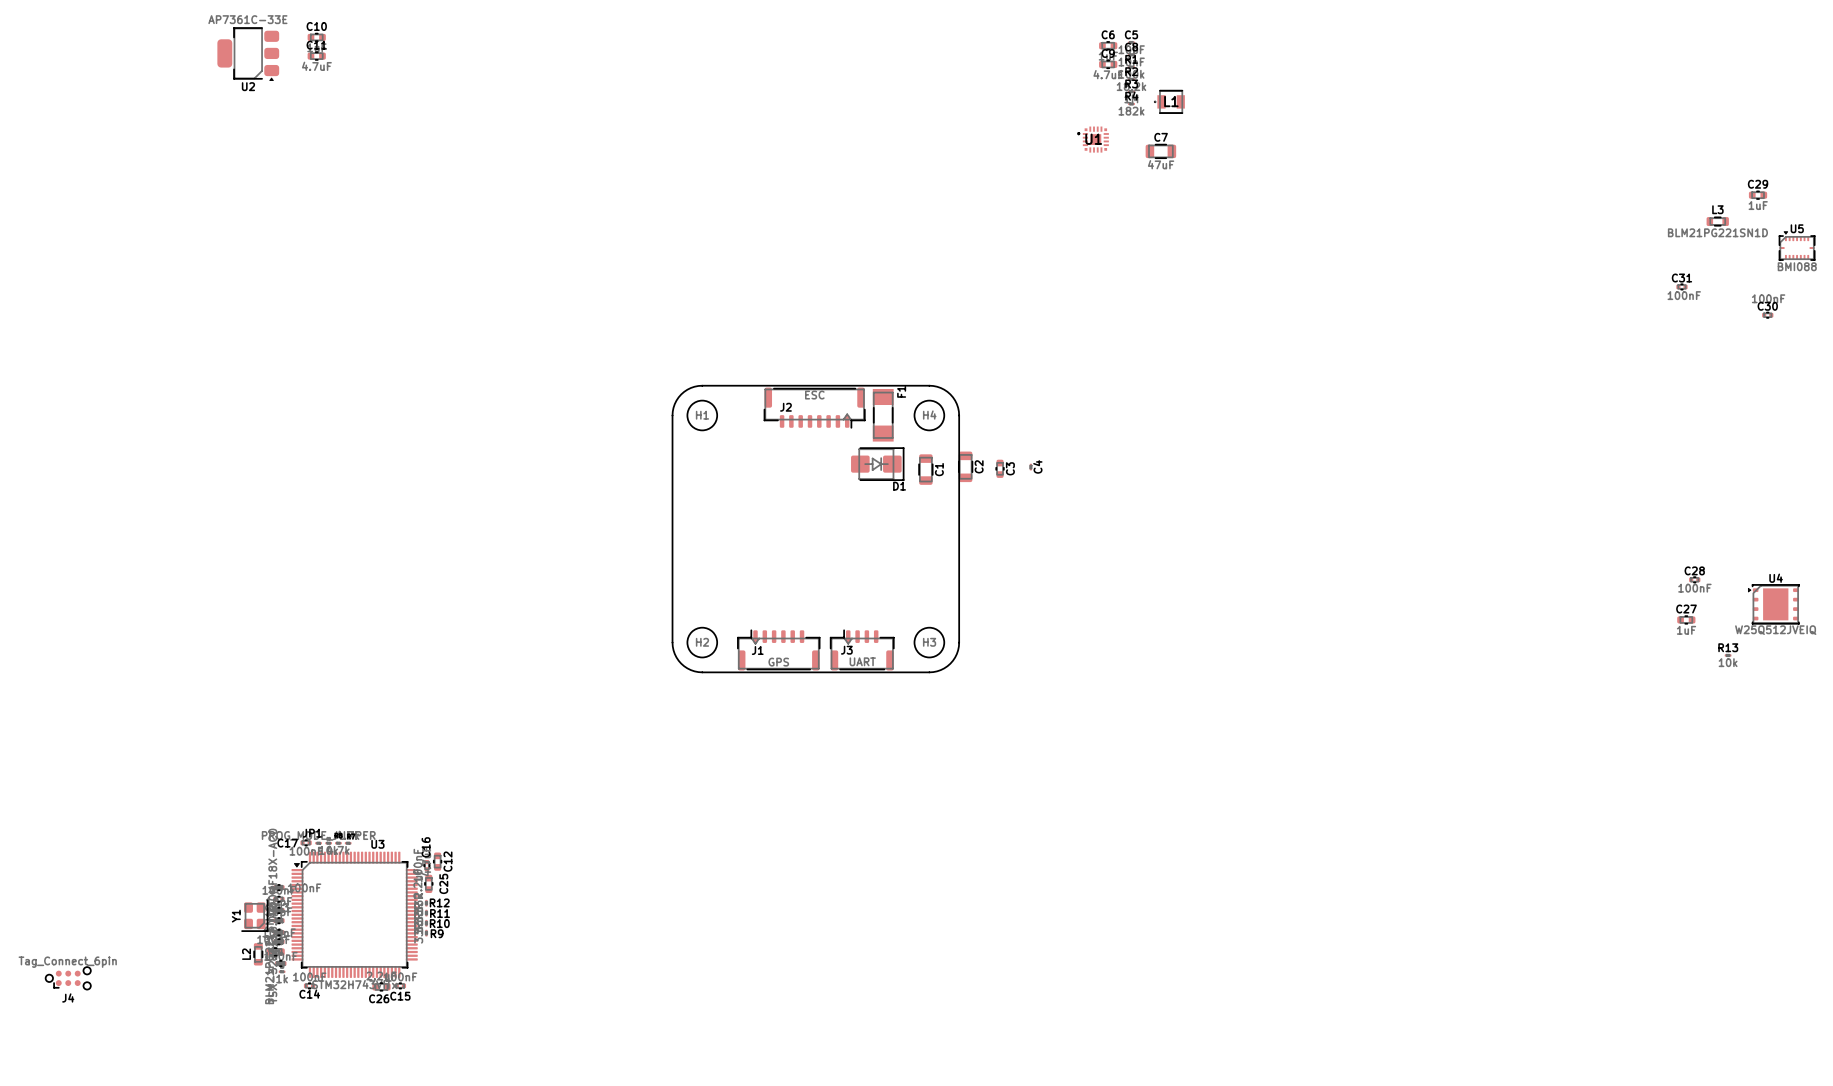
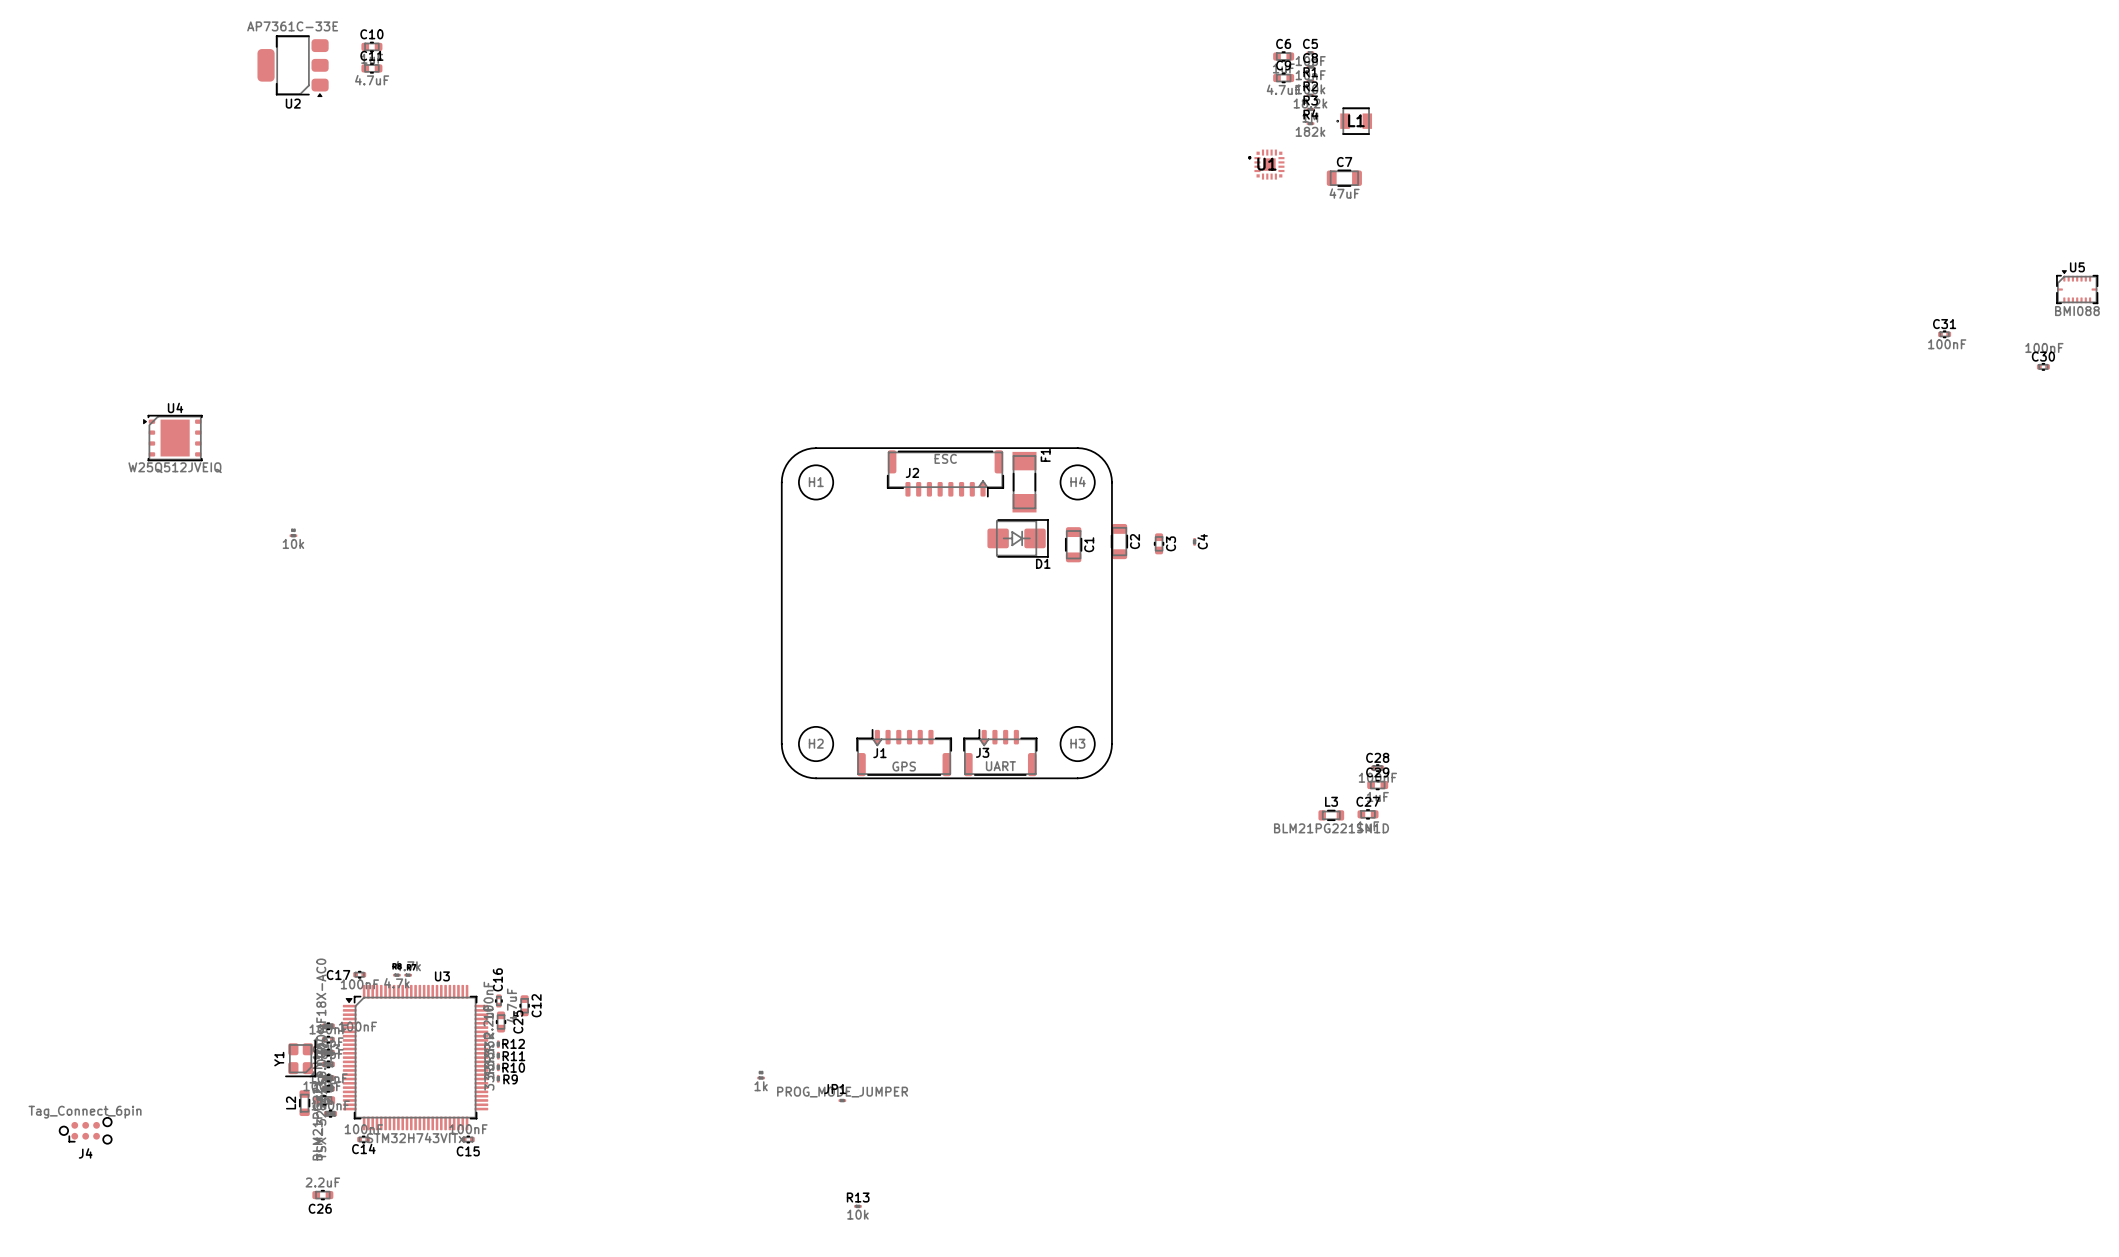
C29 position: (1758, 195) -> (1377, 785)
L3 position: (1717, 221) -> (1331, 815)
C28 position: (1694, 579) -> (1377, 768)
U4 position: (1773, 604) -> (172, 438)
C27 position: (1686, 619) -> (1368, 814)
R13 position: (1728, 655) -> (857, 1206)
JP1 position: (318, 843) -> (842, 1100)
part position: (328, 843) -> (293, 535)
C12 position: (437, 861) -> (524, 1005)
part position: (282, 971) -> (761, 1078)
C26 position: (381, 986) -> (322, 1195)

